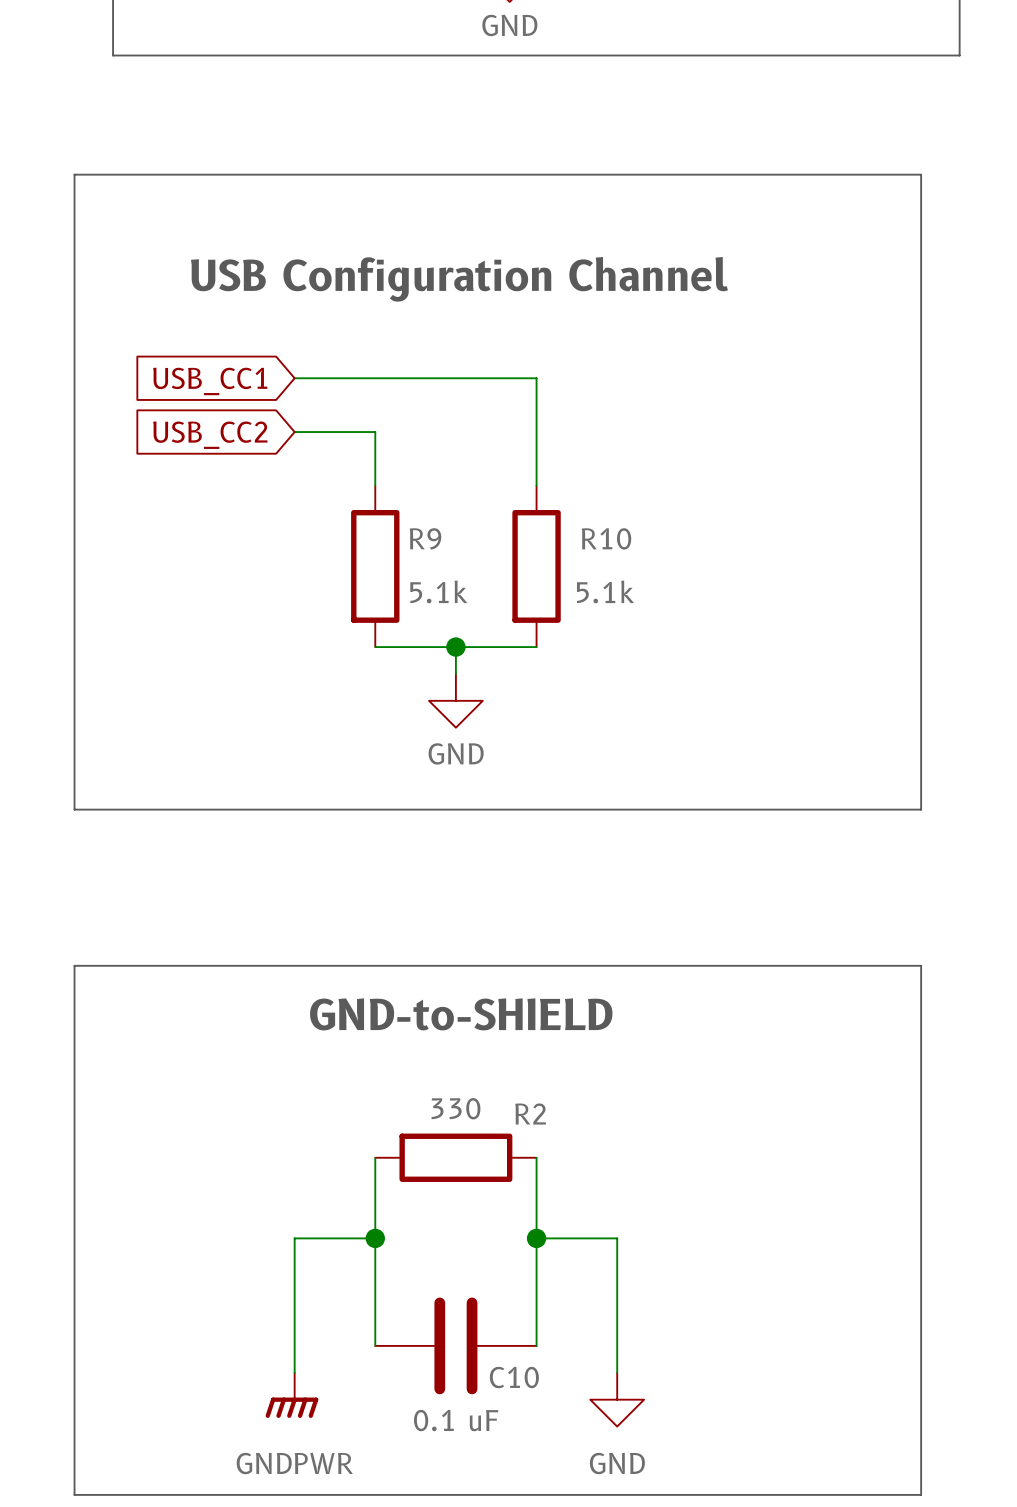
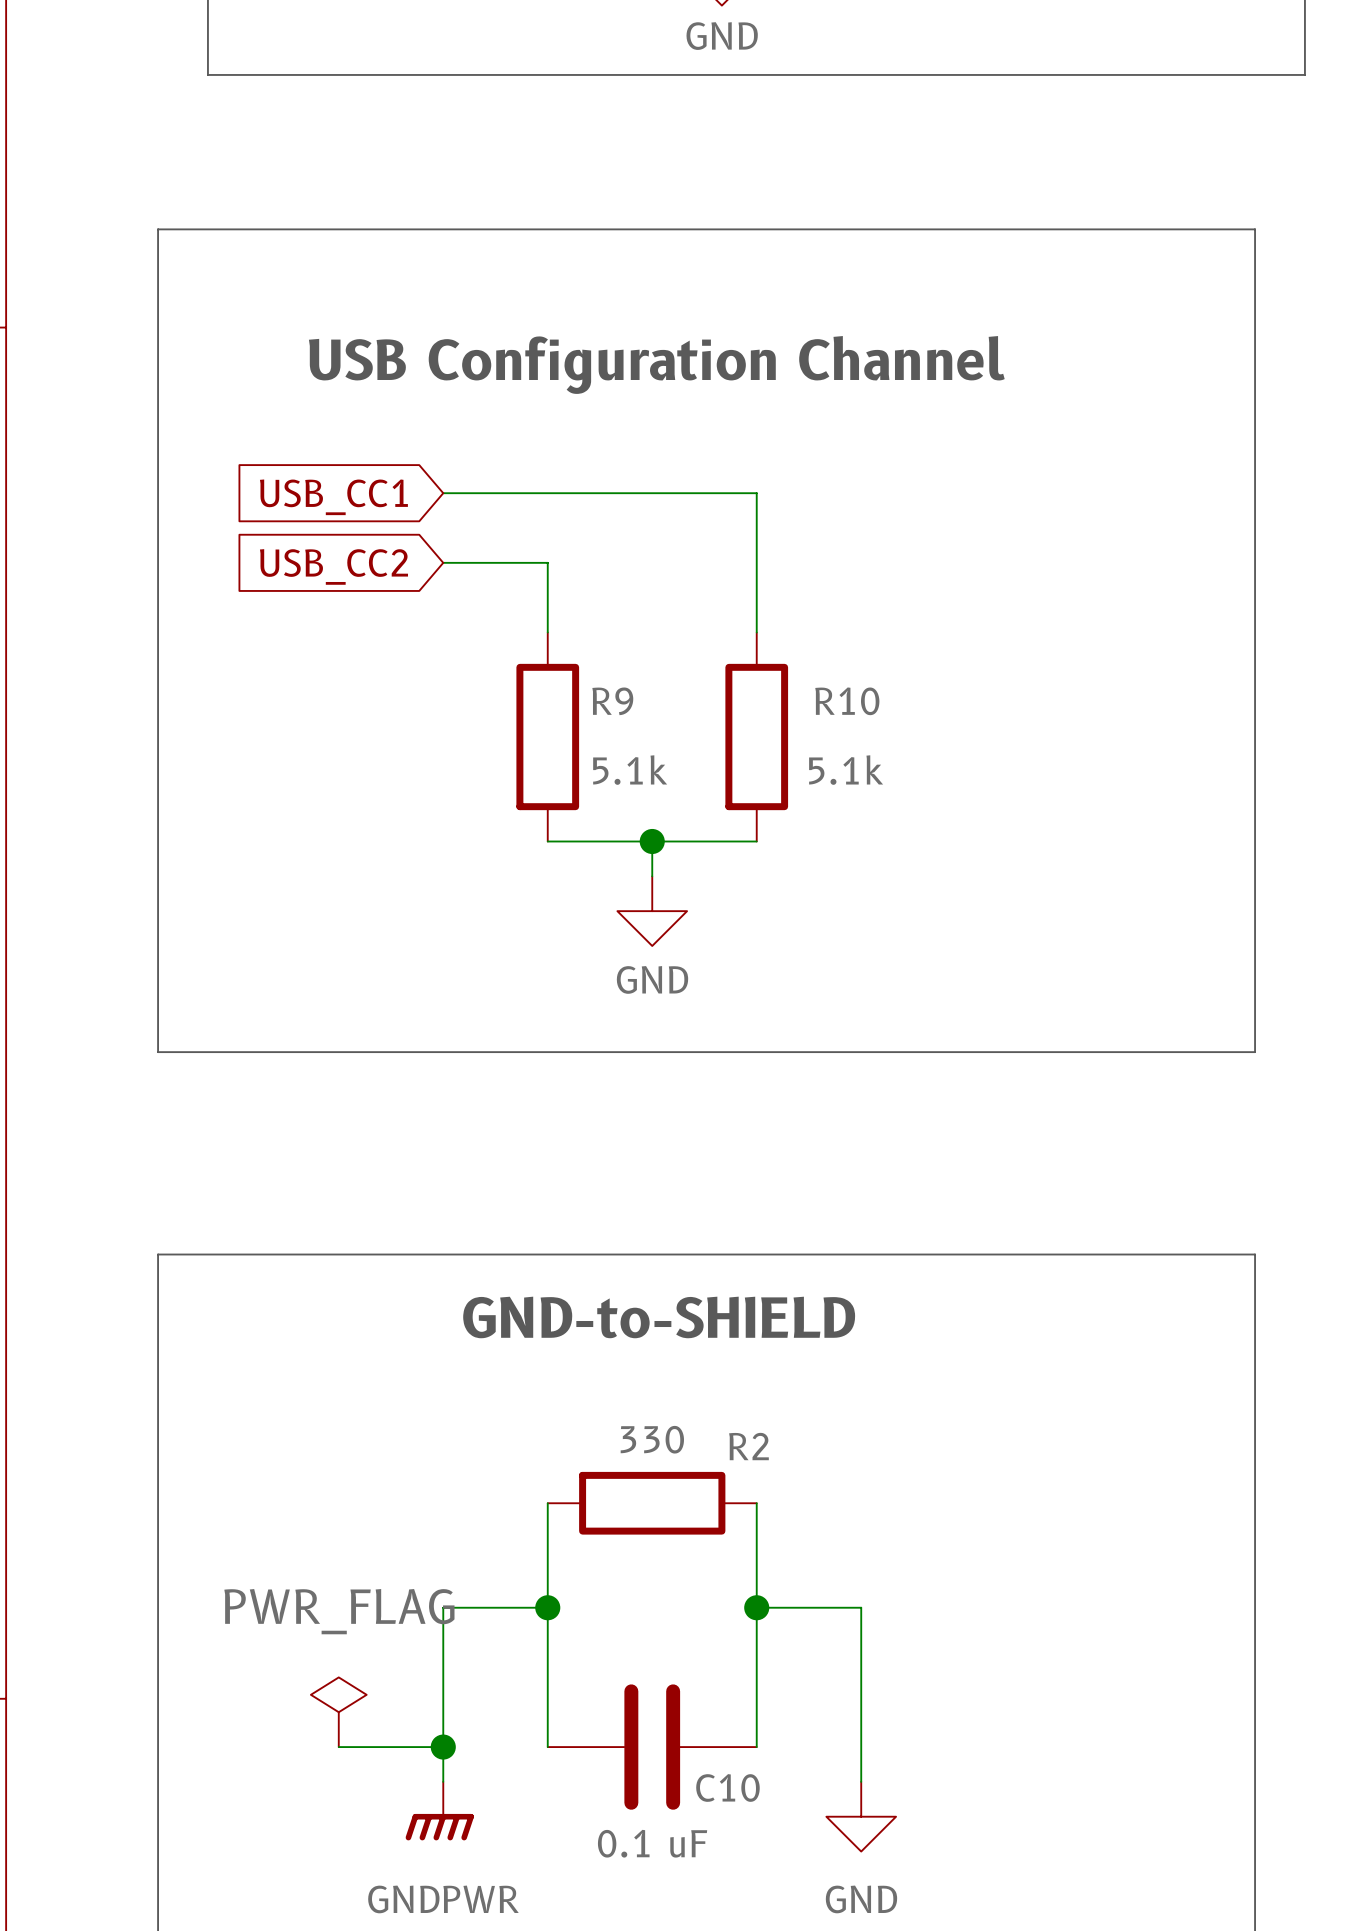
power symbol: none -> PWR_FLAG (338, 1712)
wire: none -> (338, 1747) (443, 1747)
junction: none -> (443, 1747)

